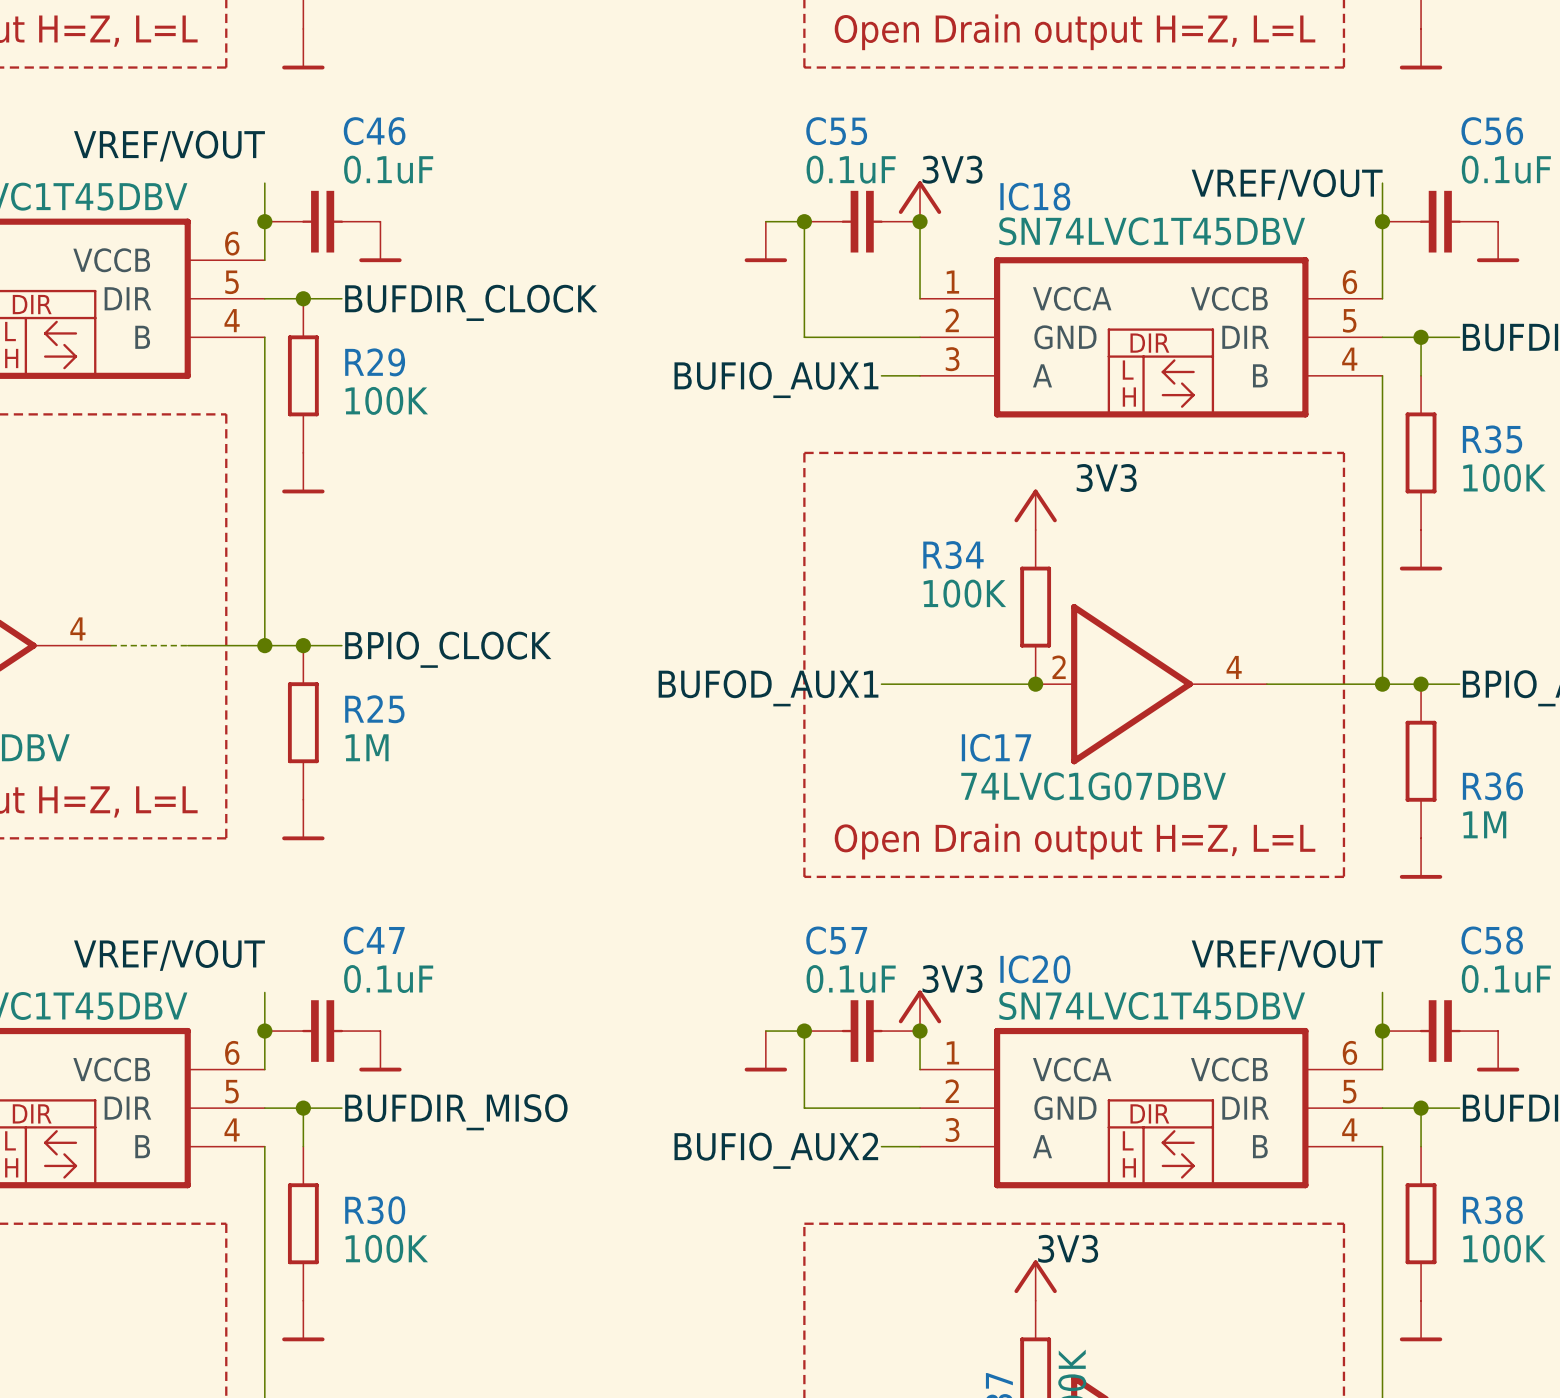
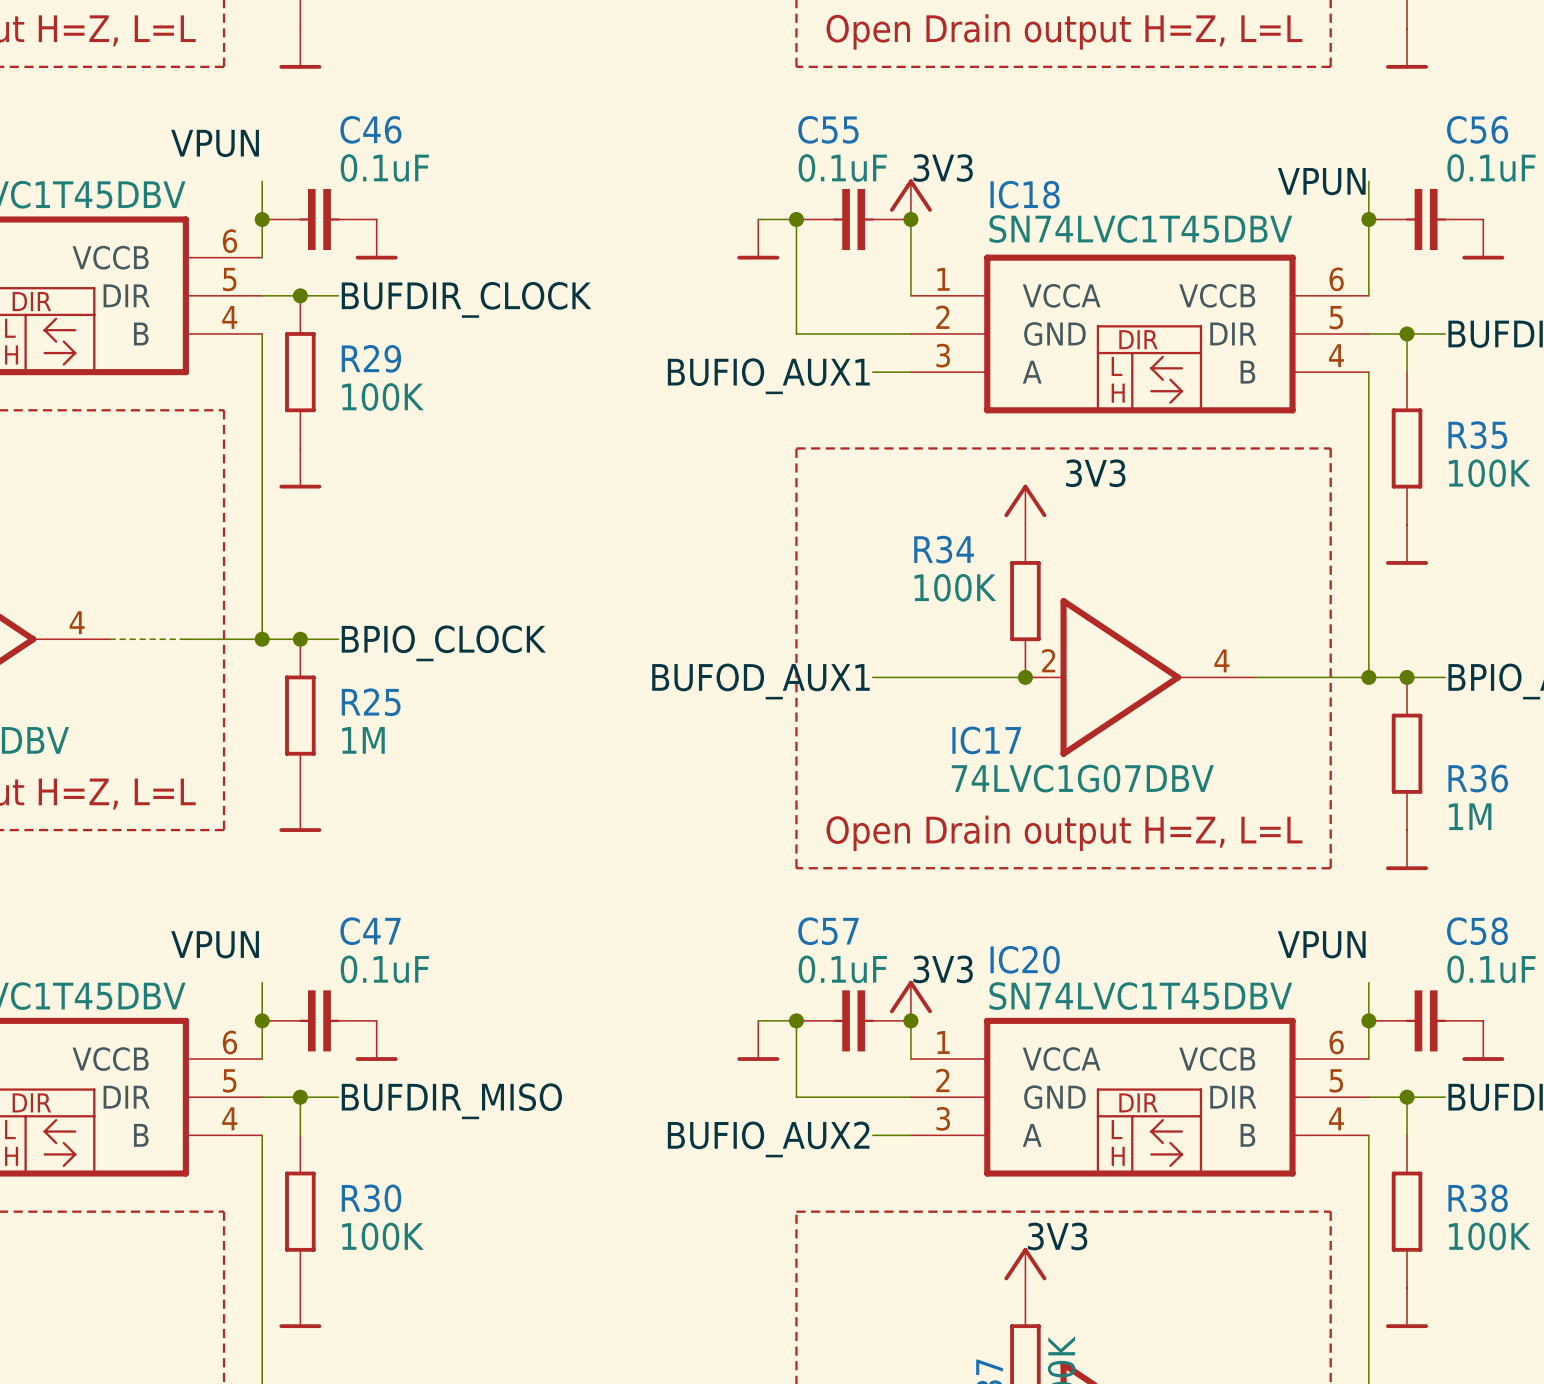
label: VREF/VOUT (169, 146) -> VPUN (215, 143)
label: VREF/VOUT (1287, 184) -> VPUN (1321, 181)
label: VREF/VOUT (169, 955) -> VPUN (215, 944)
label: VREF/VOUT (1287, 955) -> VPUN (1321, 944)

